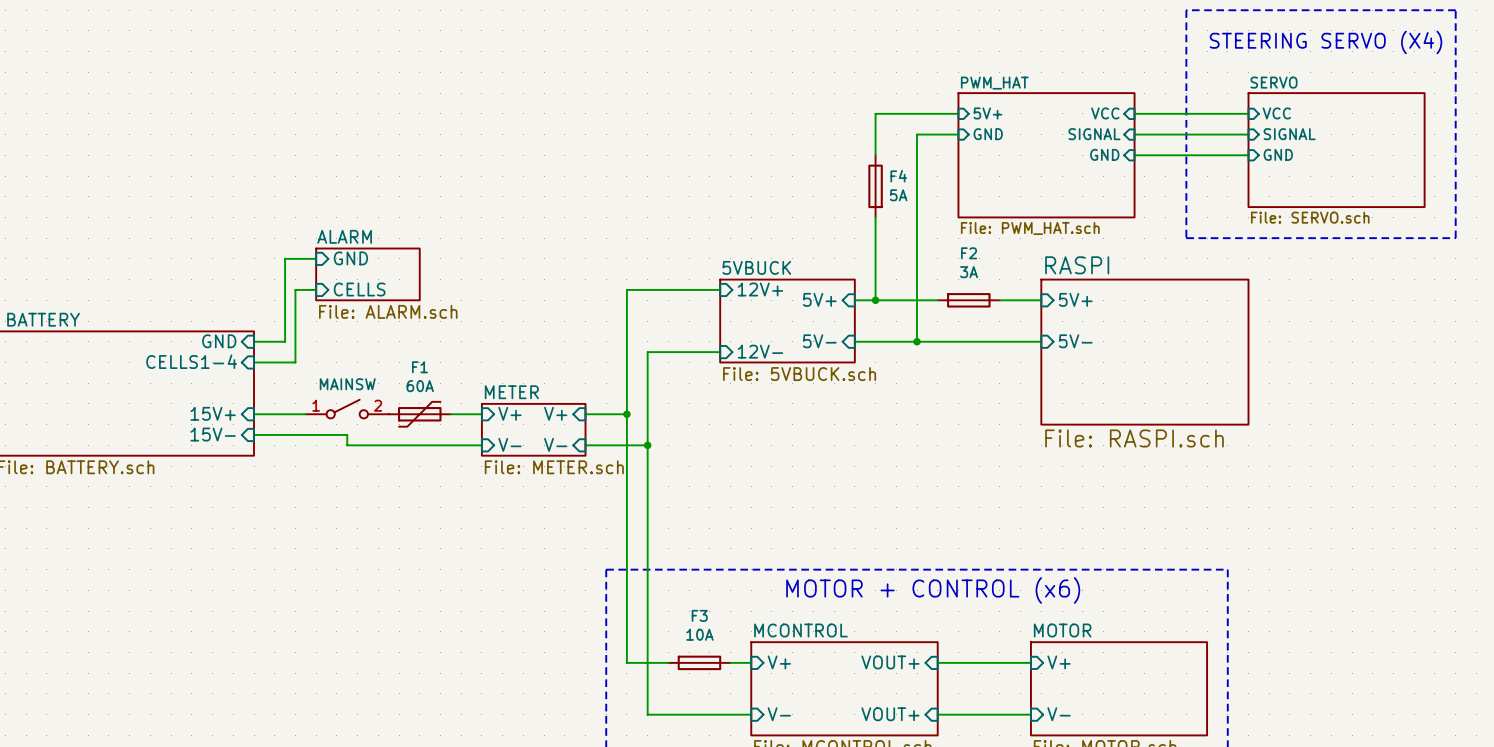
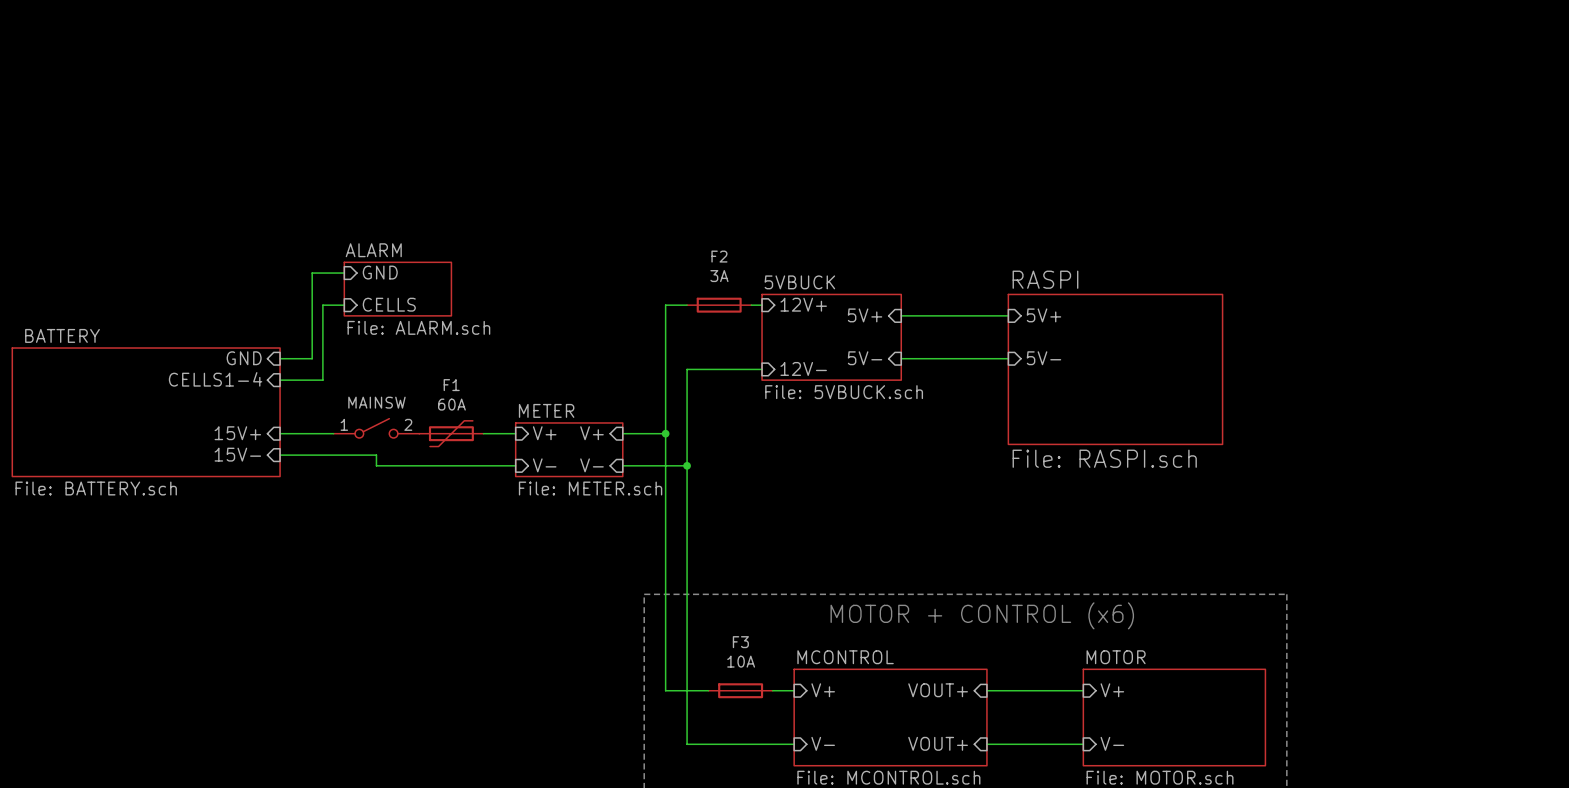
line: (1186, 10) (1186, 238) (1455, 238) (1455, 10) (1186, 10) -> none
text: STEERING SERVO (X4) (1326, 42) -> none
wire: (958, 113) (875, 113) (875, 155) -> none
sheet pin: 5V+ (987, 113) -> none
sheet pin: VCC (1105, 113) -> none
wire: (1134, 113) (1248, 113) -> none
sheet pin: VCC (1276, 113) -> none
wire: (958, 134) (917, 134) (917, 341) -> none
sheet pin: GND (988, 134) -> none
sheet pin: SIGNAL (1094, 134) -> none
wire: (1134, 134) (1248, 134) -> none
sheet pin: SIGNAL (1289, 134) -> none
sheet SERVO: File: SERVO.sch (1336, 150) -> none
sheet pin: GND (1104, 154) -> none
sheet pin: GND (1278, 154) -> none
sheet PWM_HAT: File: PWM_HAT.sch (1046, 155) -> none
wire: (1134, 155) (1248, 155) -> none
F4: 5A (875, 186) -> none
wire: (875, 217) (875, 300) -> none
sheet pin position: 5V+ (1075, 299) -> 5V+ (1043, 315)
junction: (875, 300) -> none
F2 position: (968, 300) -> (719, 305)
wire: (999, 300) (1041, 300) -> none
junction: (917, 341) -> none
wire: (958, 341) (1041, 341) -> none
sheet pin position: 5V- (1075, 341) -> 5V- (1043, 358)
sheet RASPI position: (1144, 352) -> (1115, 369)

